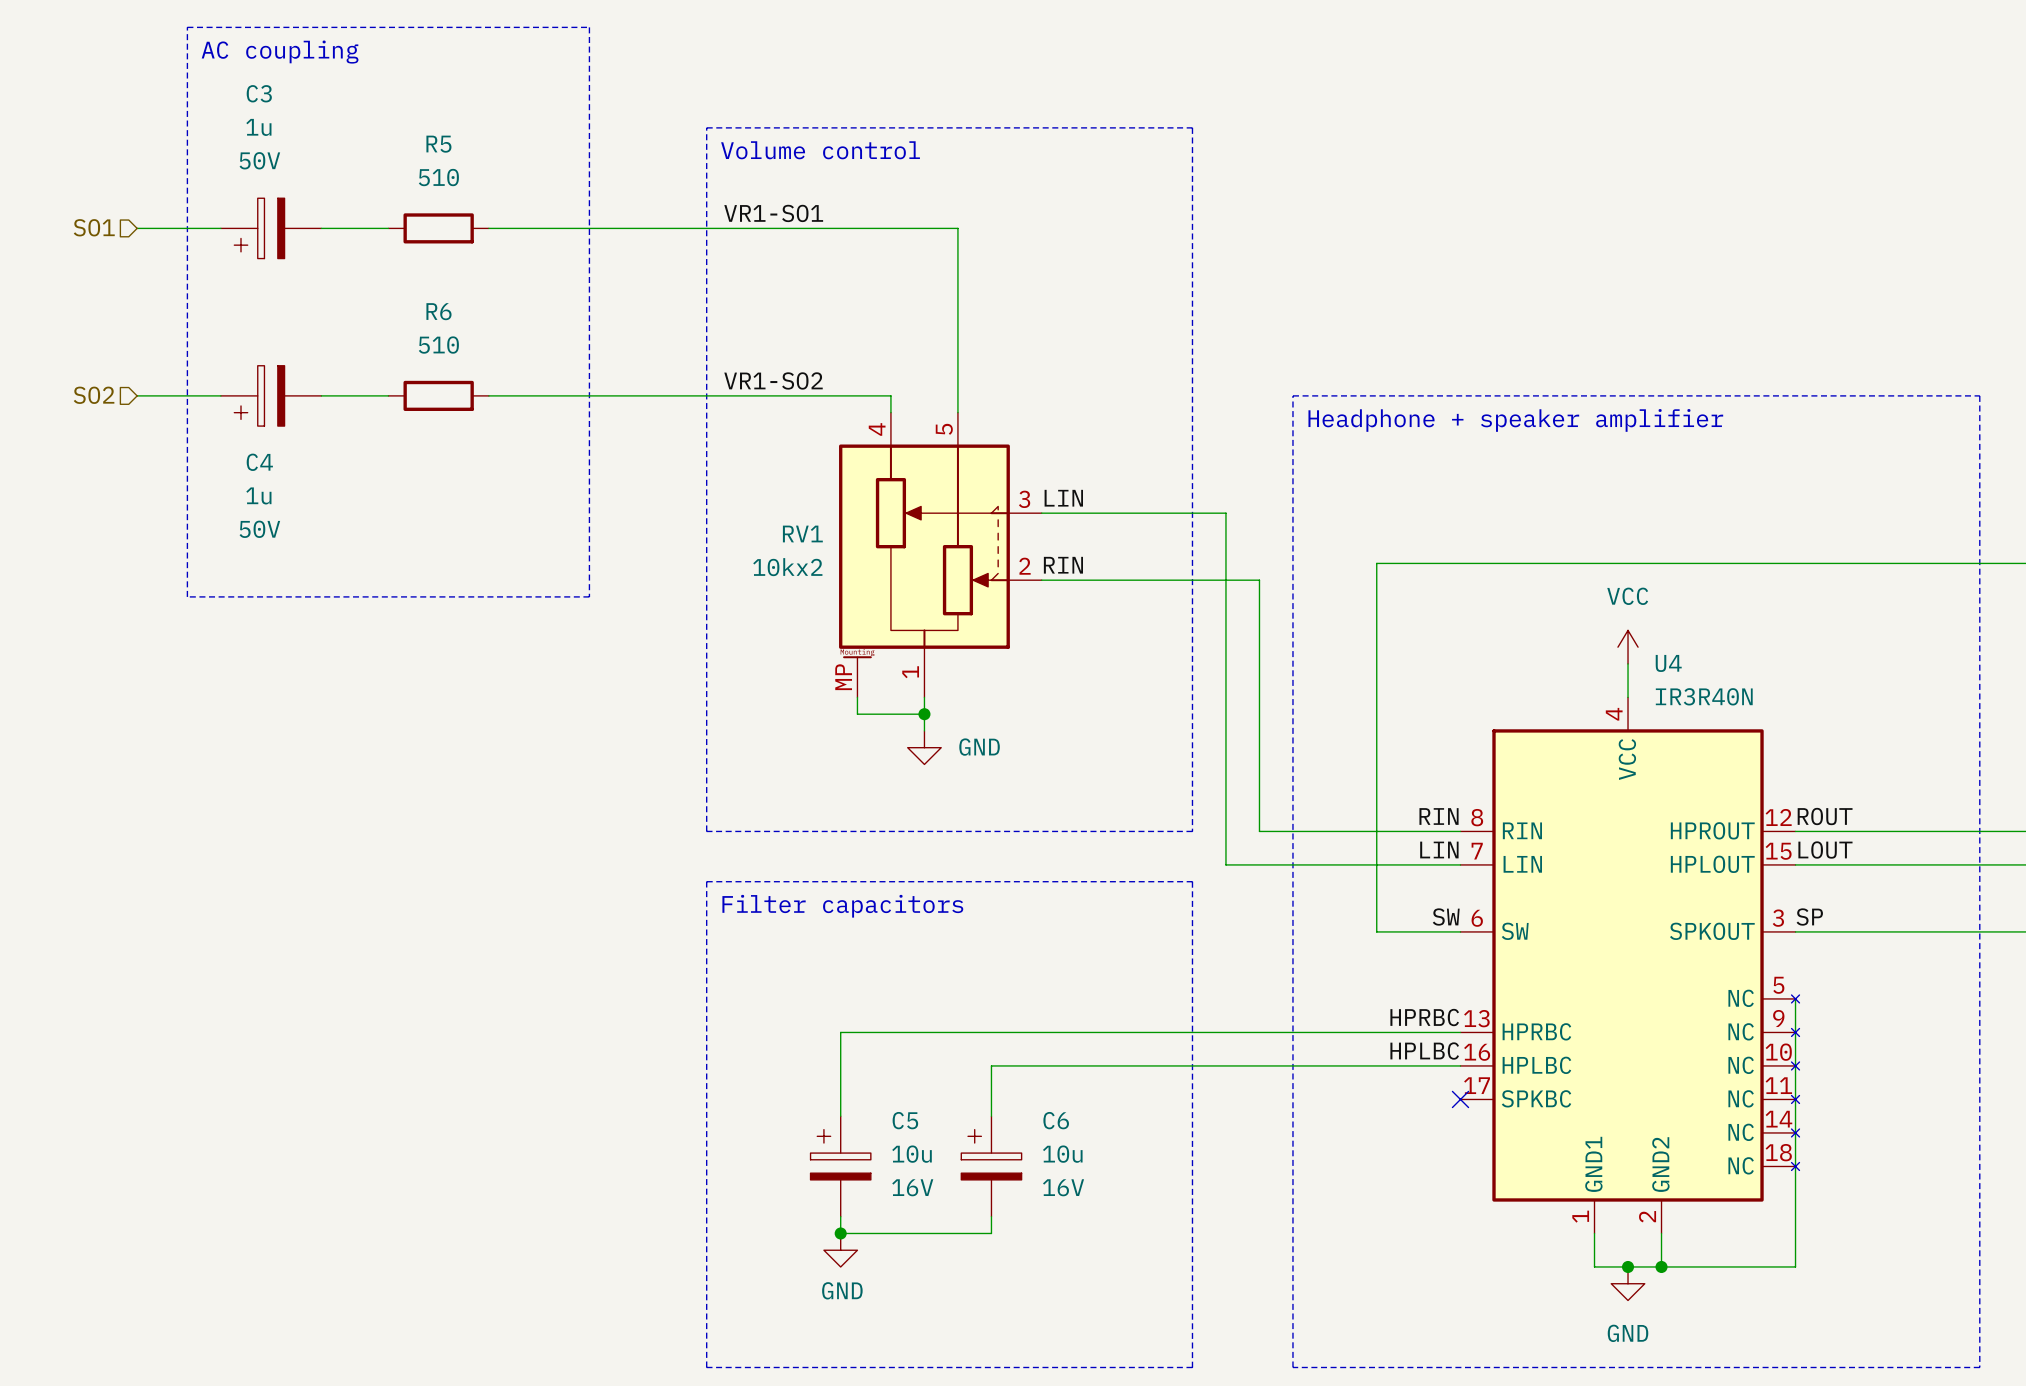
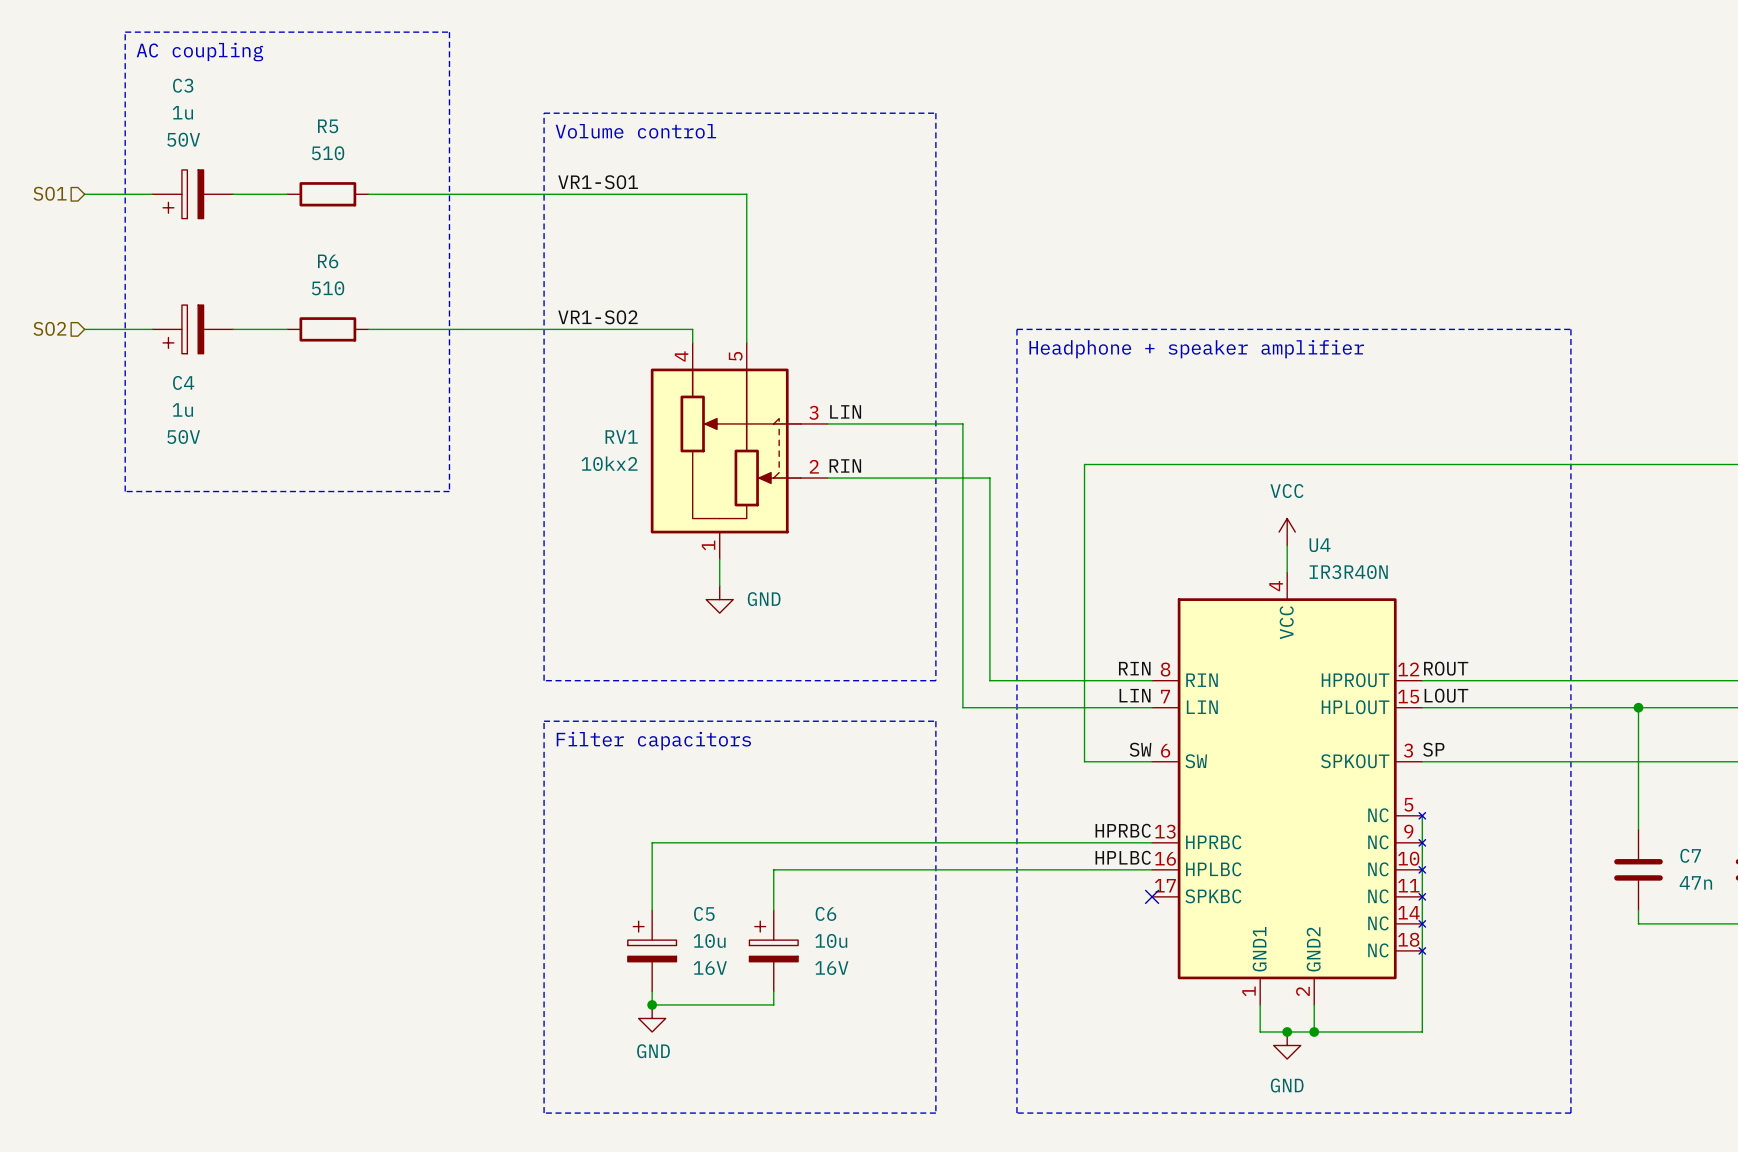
RV1 symbol: [839, 412, 1042, 698] -> [650, 342, 828, 560]
label position: LIN (1063, 498) -> LIN (845, 411)
label position: RIN (1063, 565) -> RIN (845, 465)
wire: (857, 697) (857, 714) (924, 714) (924, 730) -> none
junction: (924, 714) -> none
power symbol position: GND (924, 747) -> GND (719, 599)

